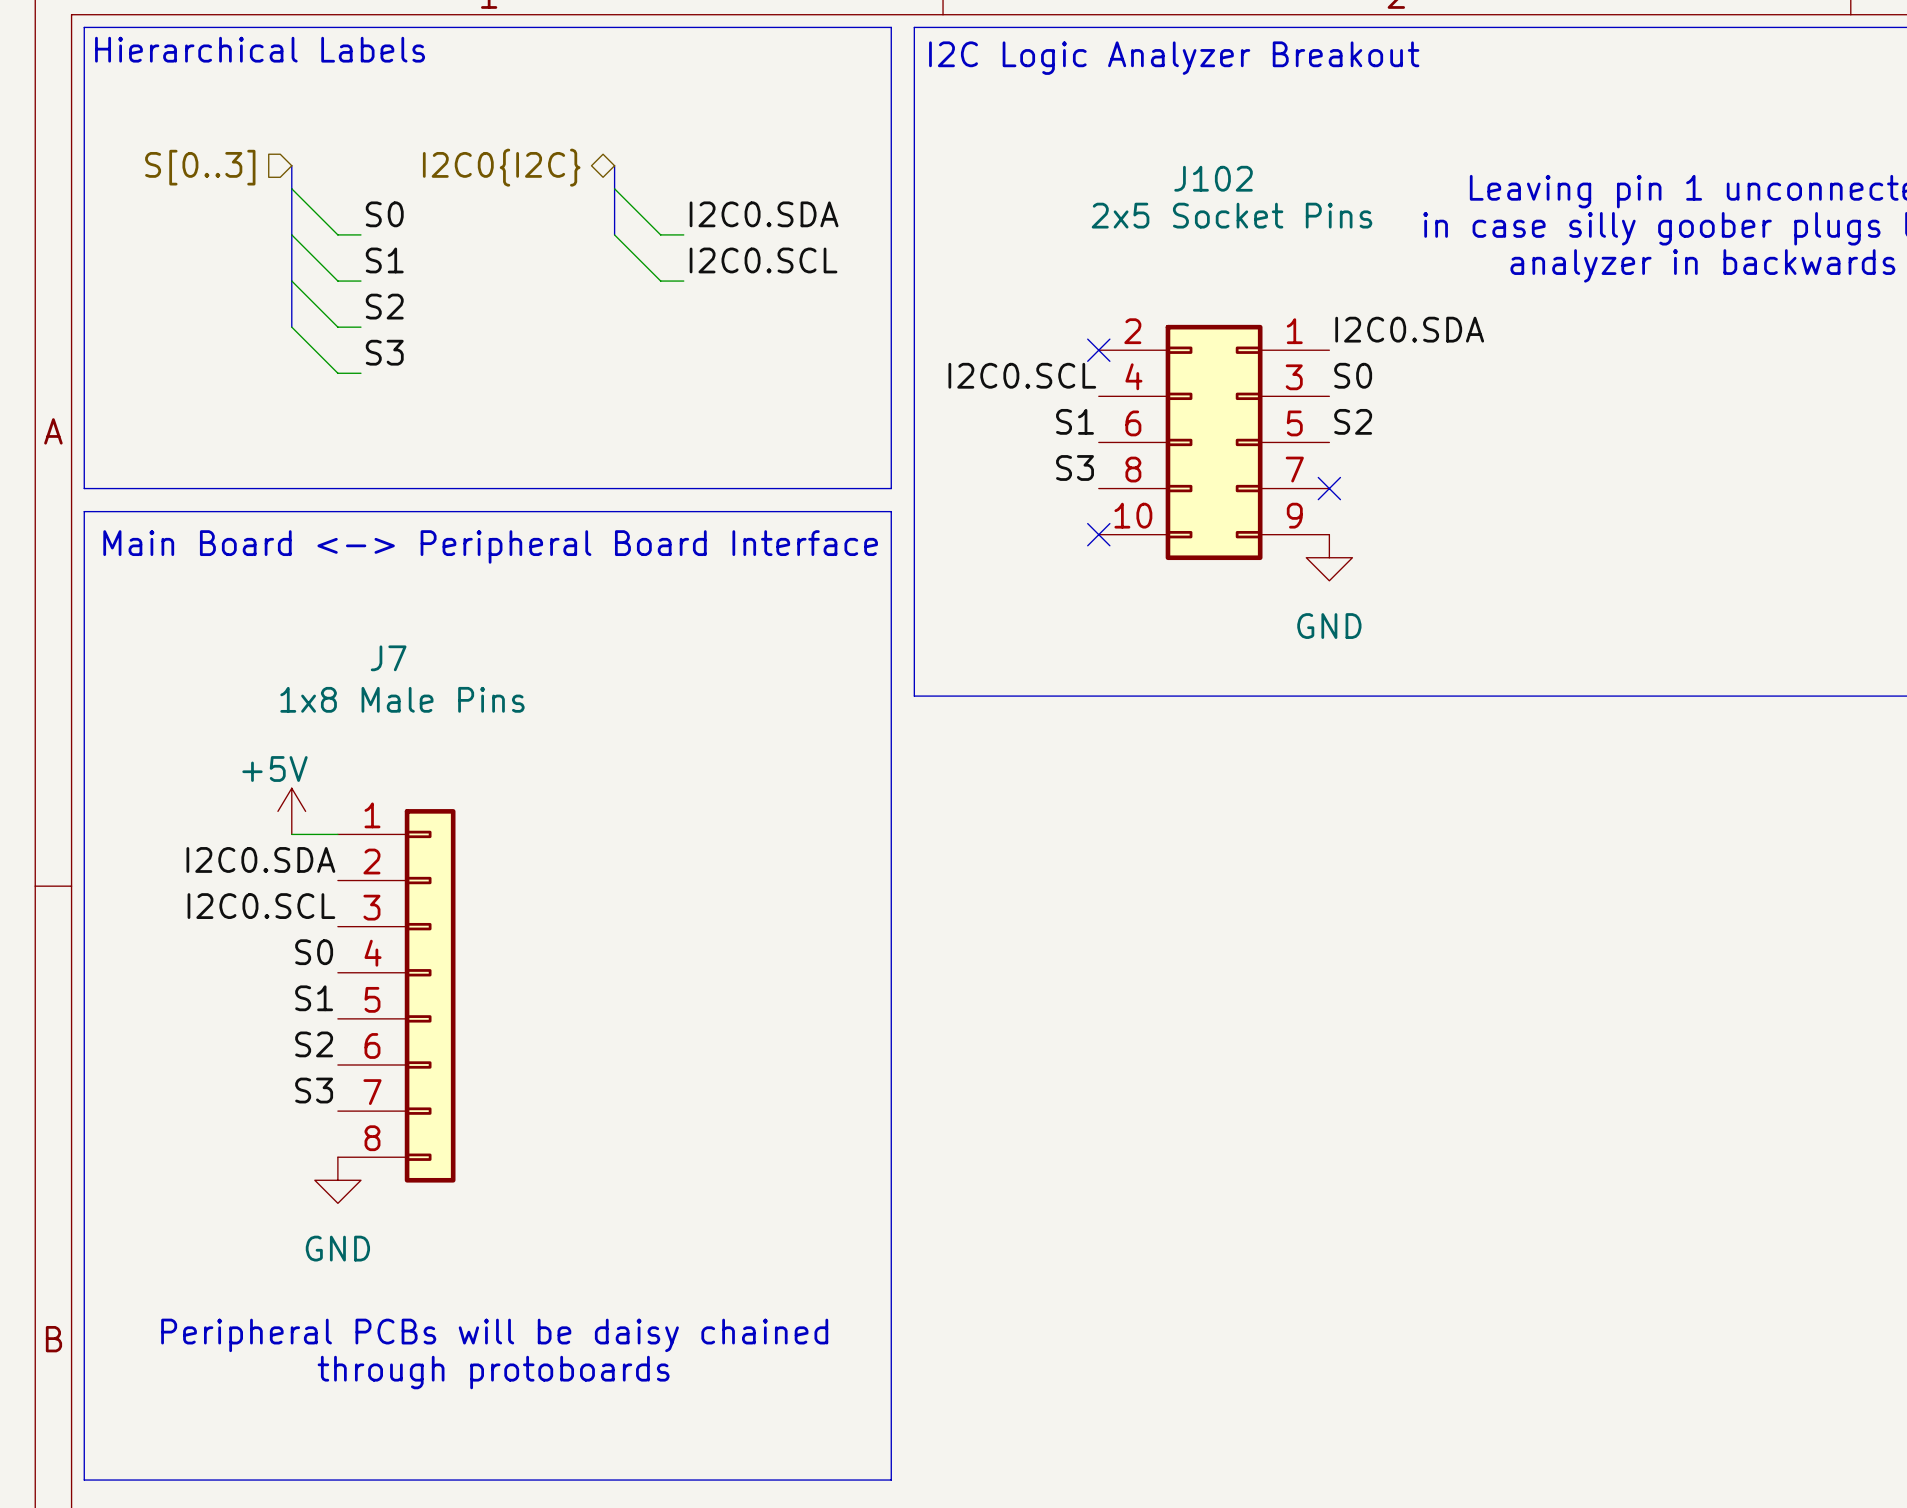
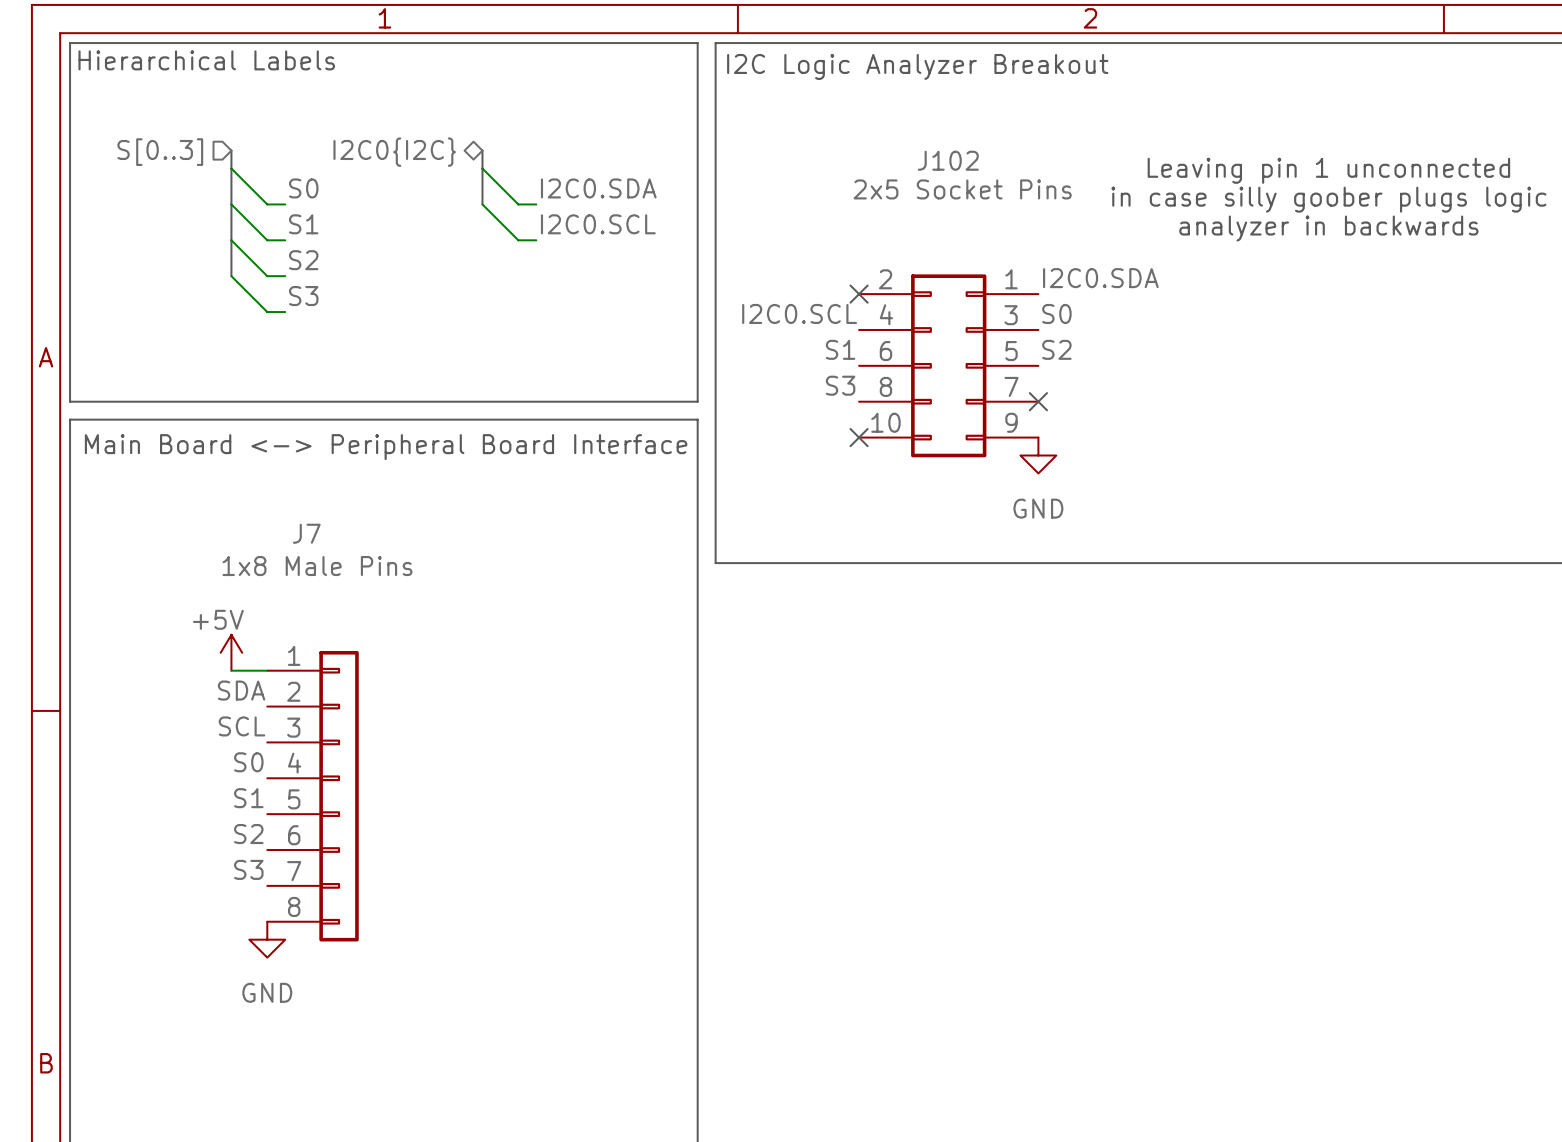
label: I2C0.SDA (260, 859) -> SDA (241, 690)
label: I2C0.SCL (261, 906) -> SCL (241, 726)
text: Peripheral PCBs will be daisy chained (494, 1335) -> none
text: through protoboards (493, 1372) -> none

